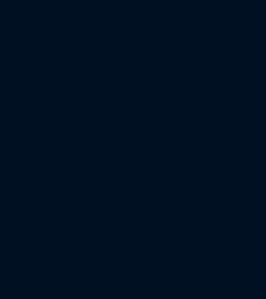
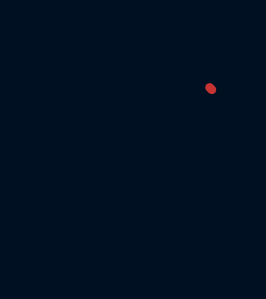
track: none -> (209, 87) (211, 89)

